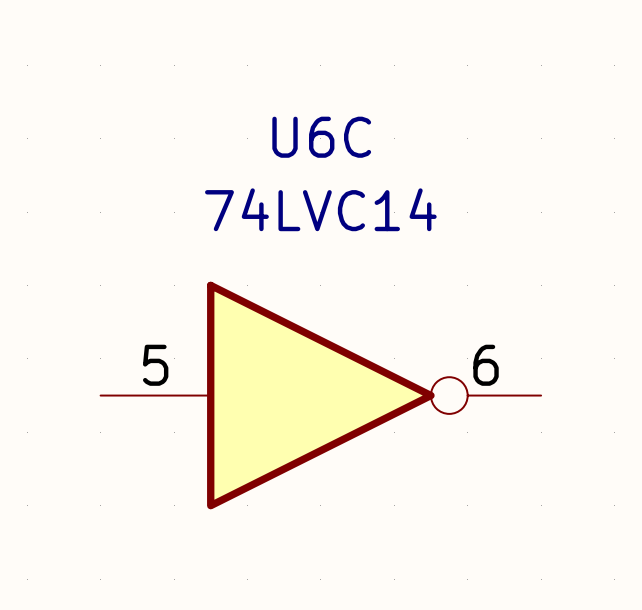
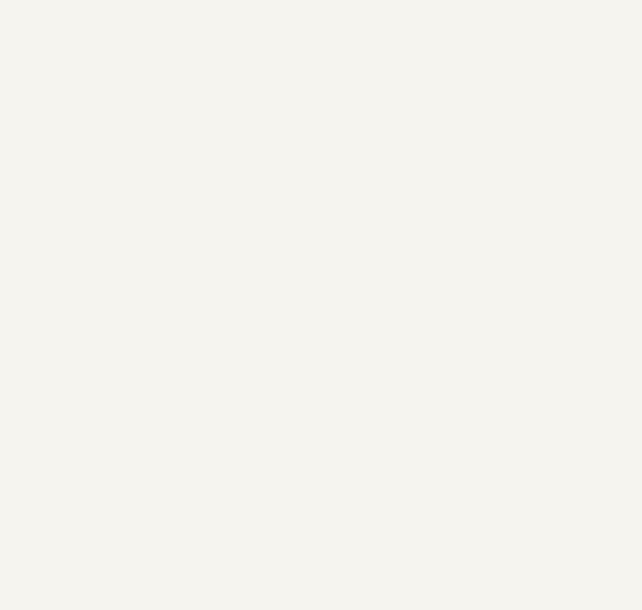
U6C: 74LVC14 (320, 395) -> none

